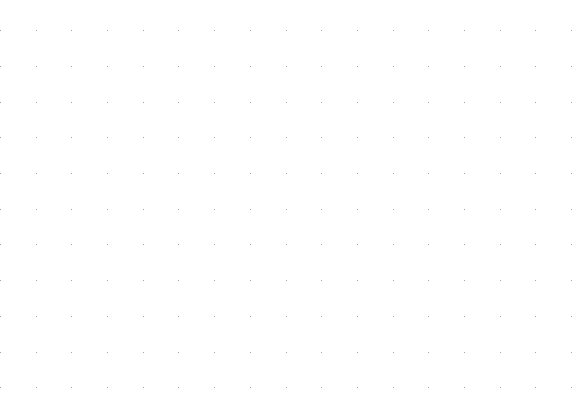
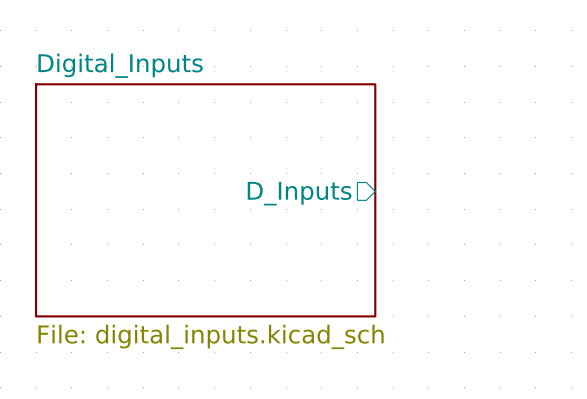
sheet pin: none -> D_Inputs (299, 193)
sheet Digital_Inputs: none -> File: digital_inputs.kicad_sch (205, 200)

